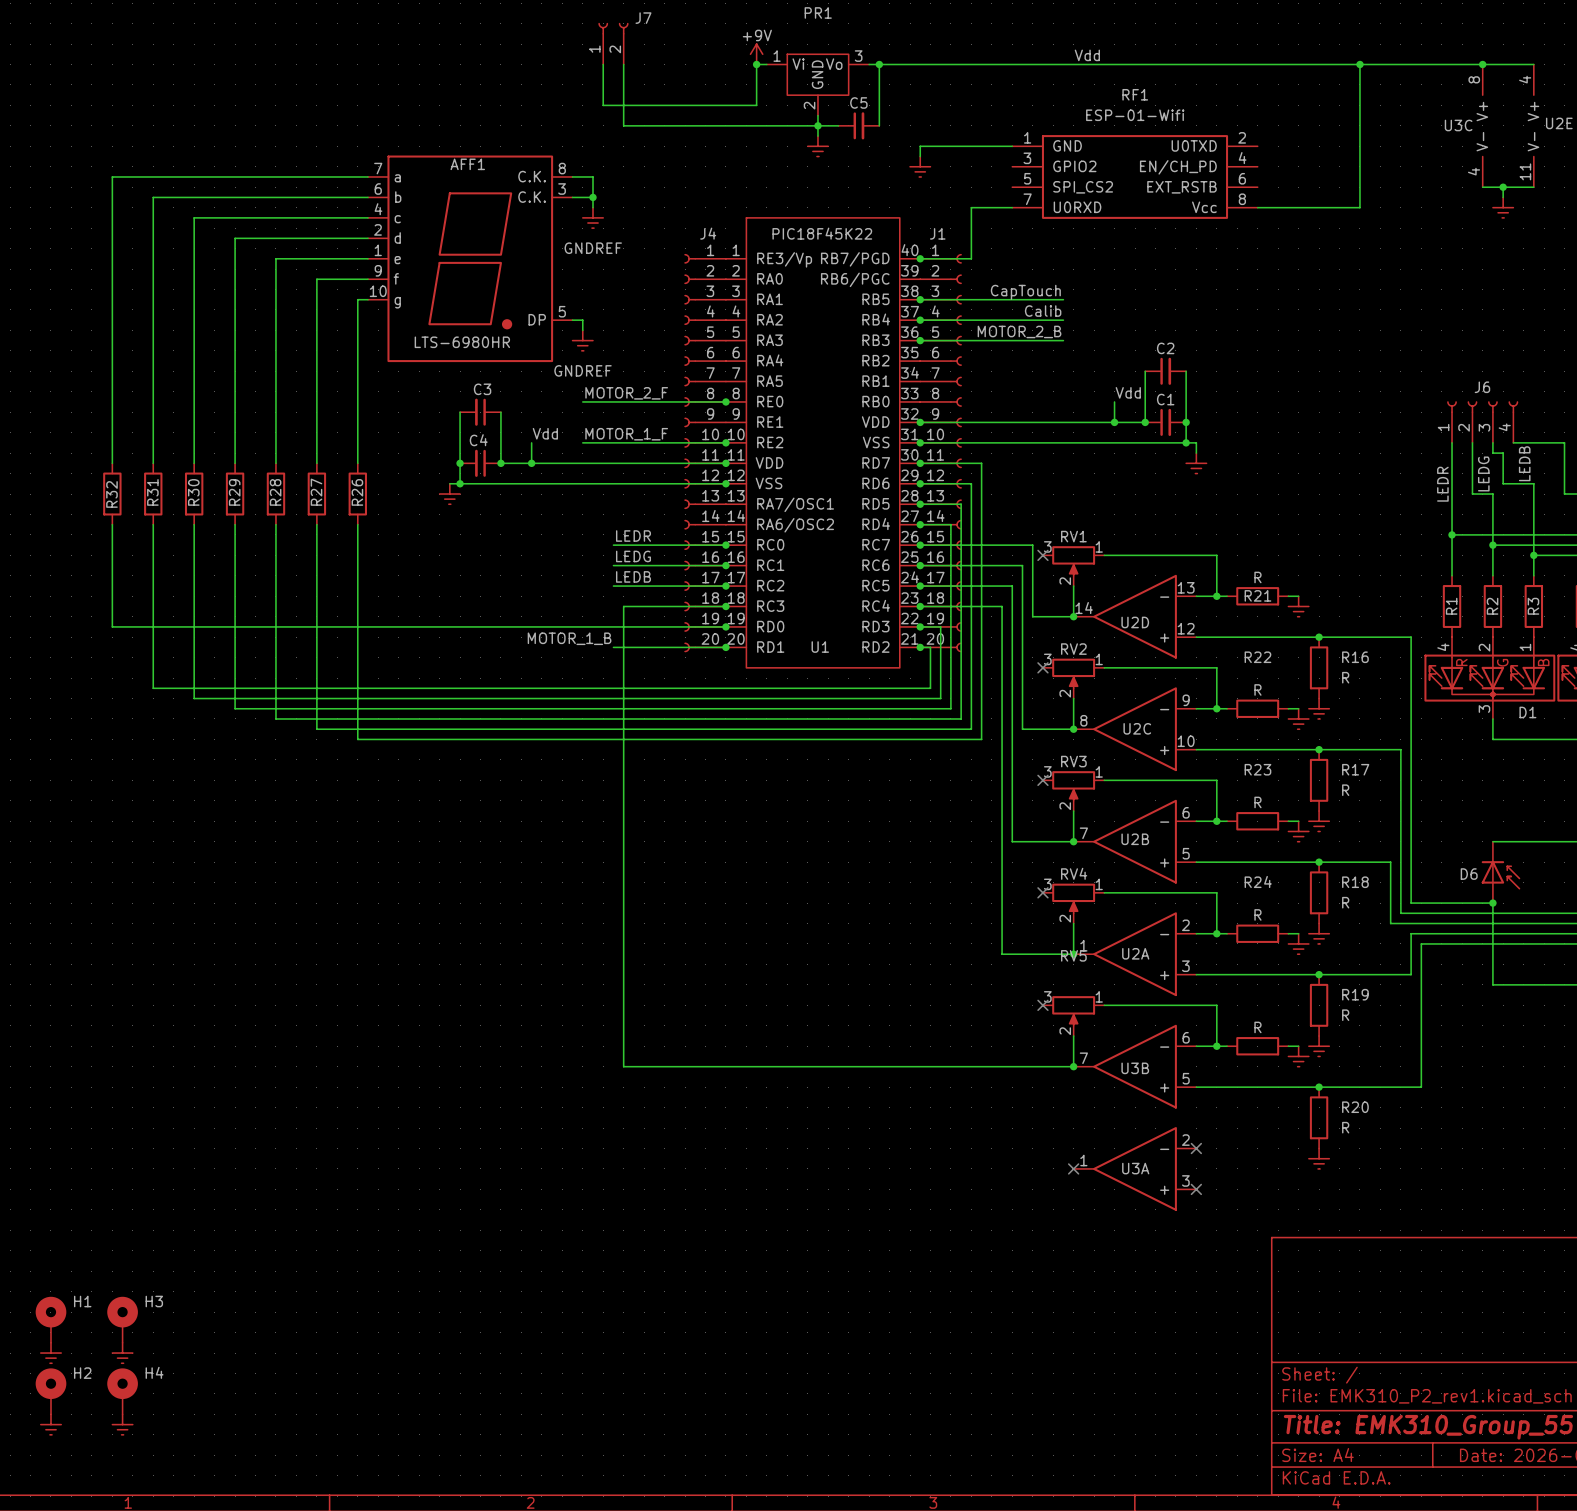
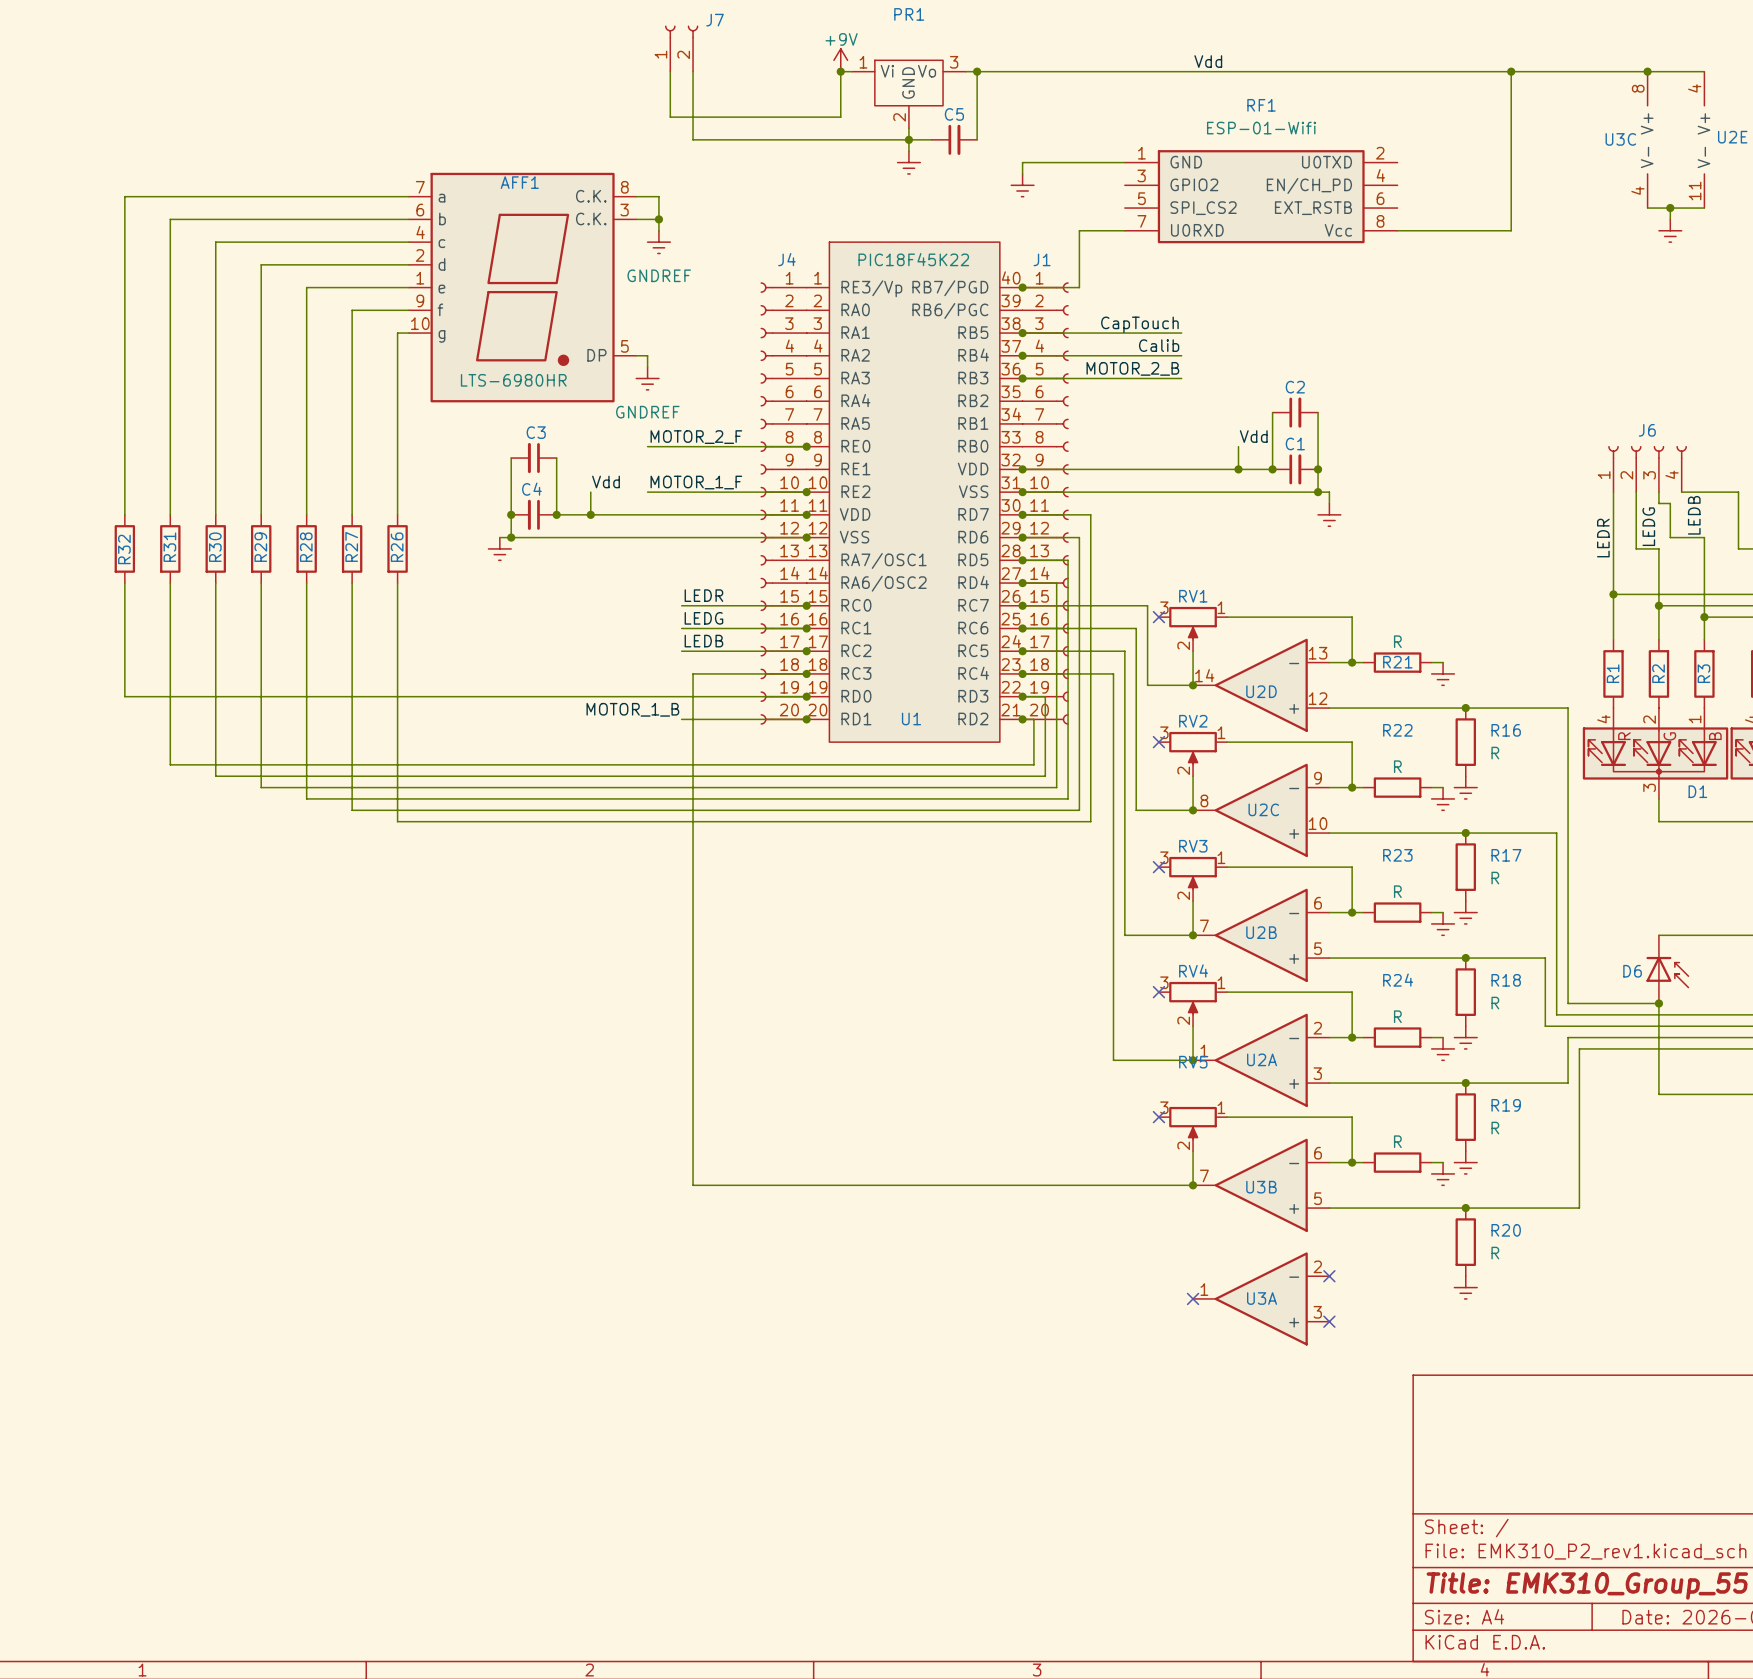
H1: (50, 1319) -> none
H3: (122, 1319) -> none
power symbol: (50, 1353) -> none
power symbol: (122, 1353) -> none
H2: (50, 1391) -> none
H4: (122, 1391) -> none
power symbol: (50, 1424) -> none
power symbol: (122, 1424) -> none

